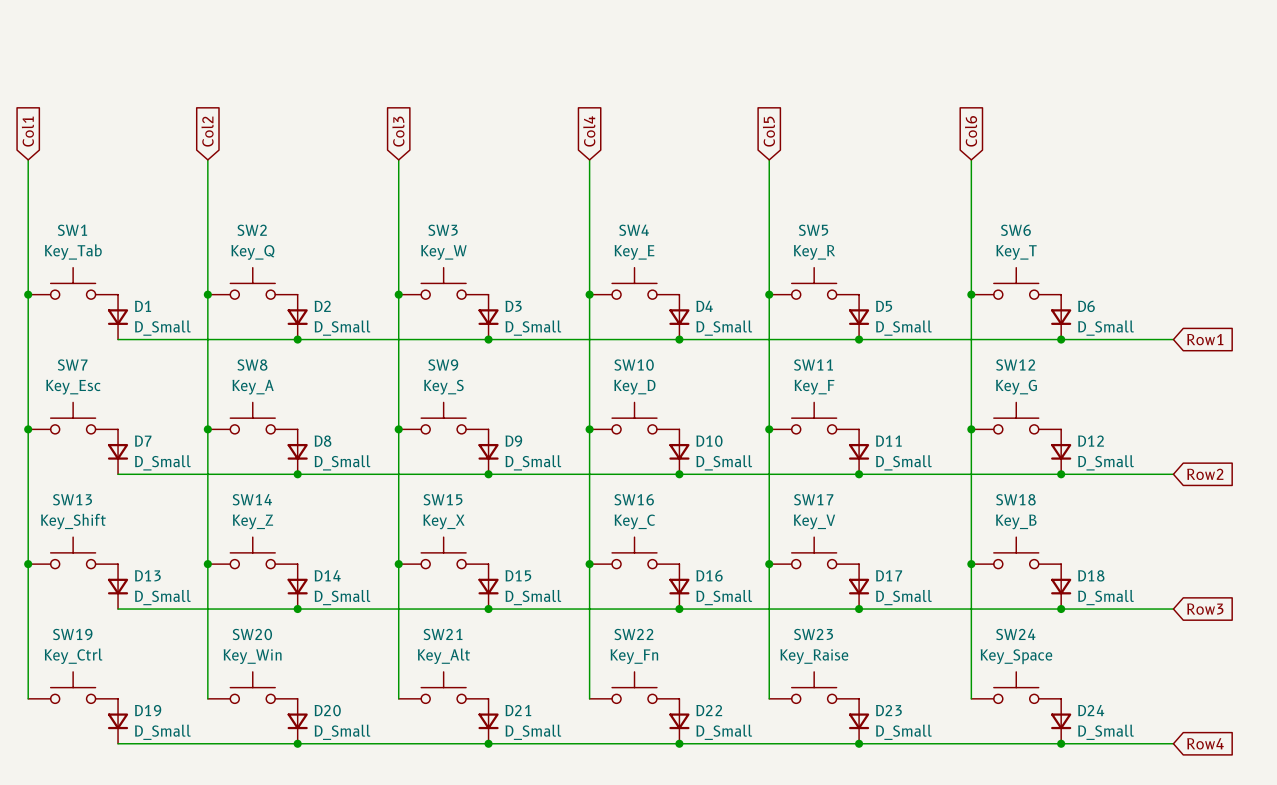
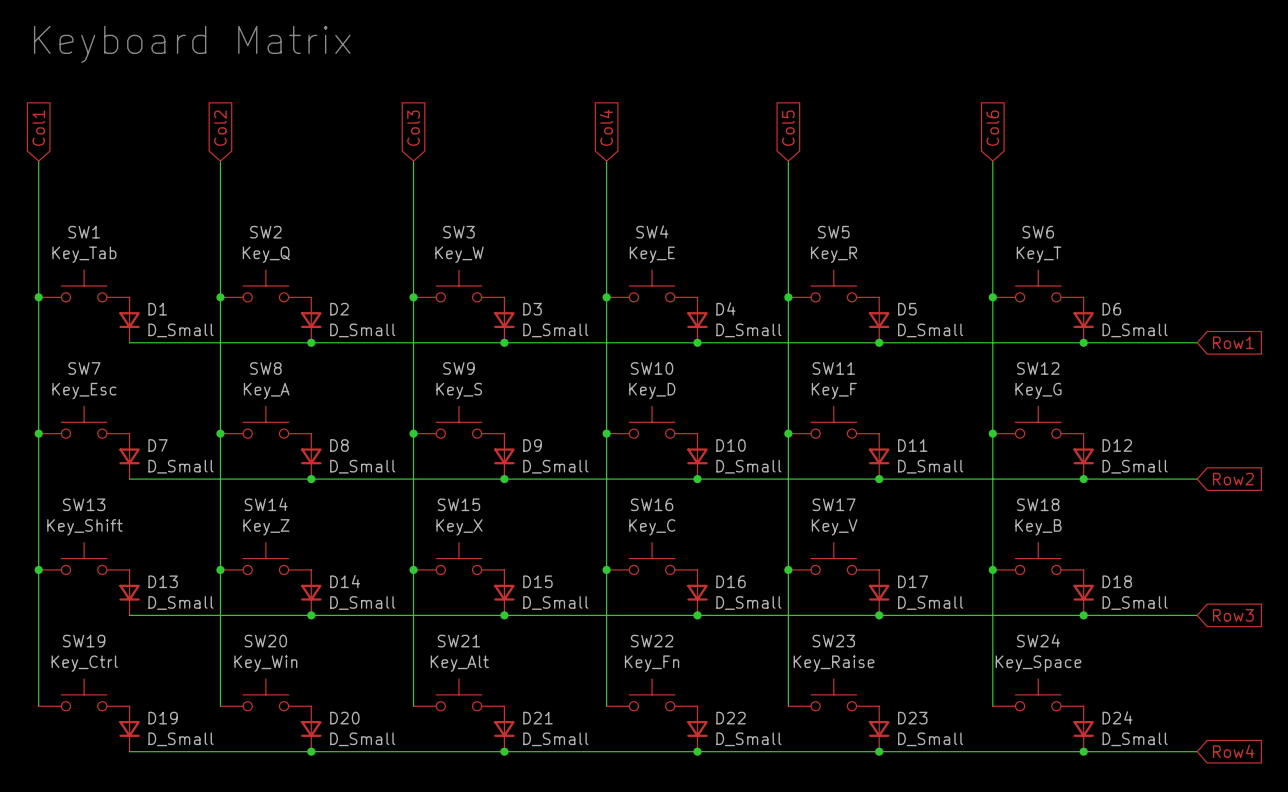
text: none -> Keyboard Matrix (192, 44)

